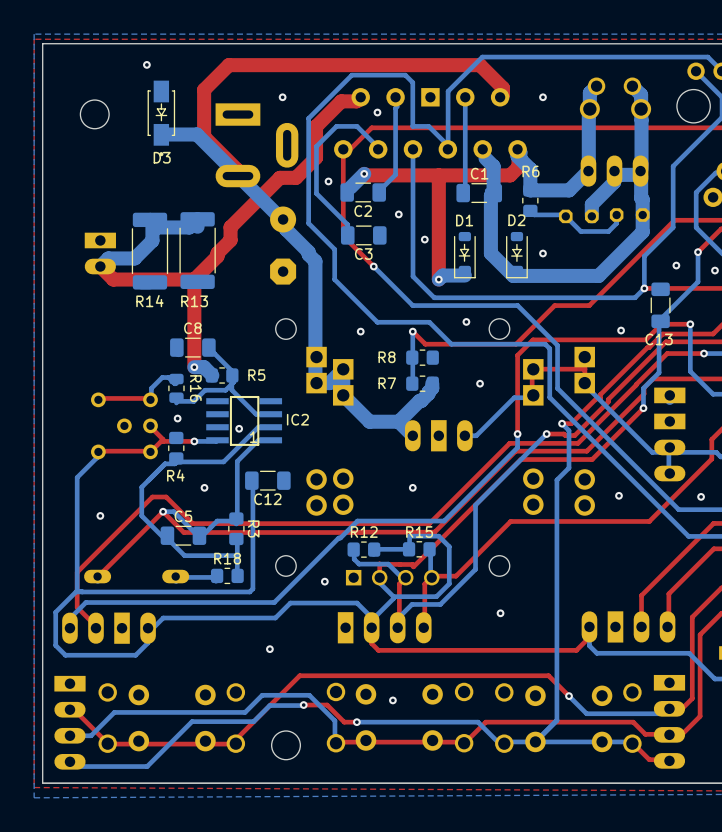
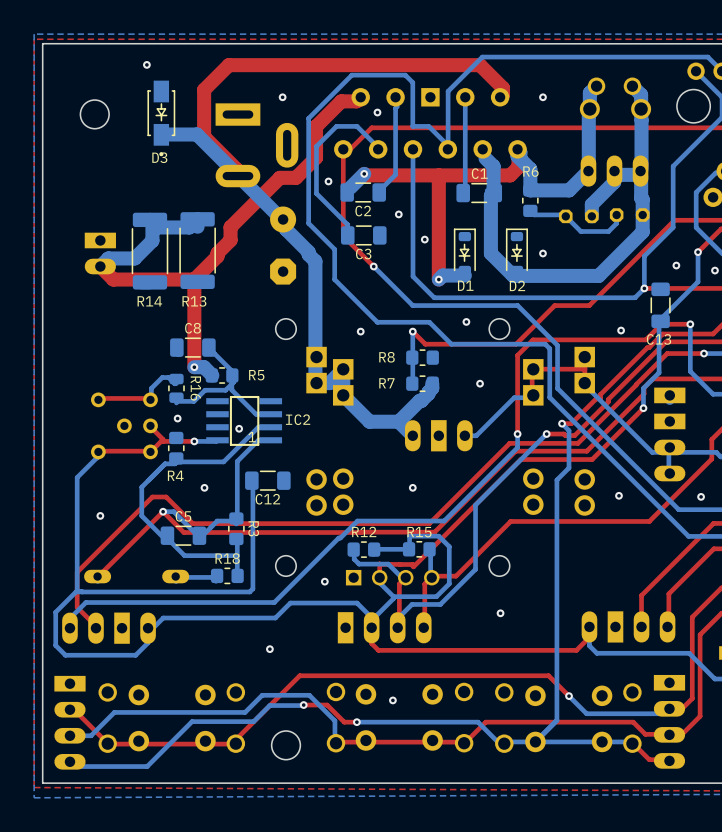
D1 rotation: 0° (464, 255) -> 180° (464, 251)
D2 rotation: 0° (516, 255) -> 180° (516, 251)

